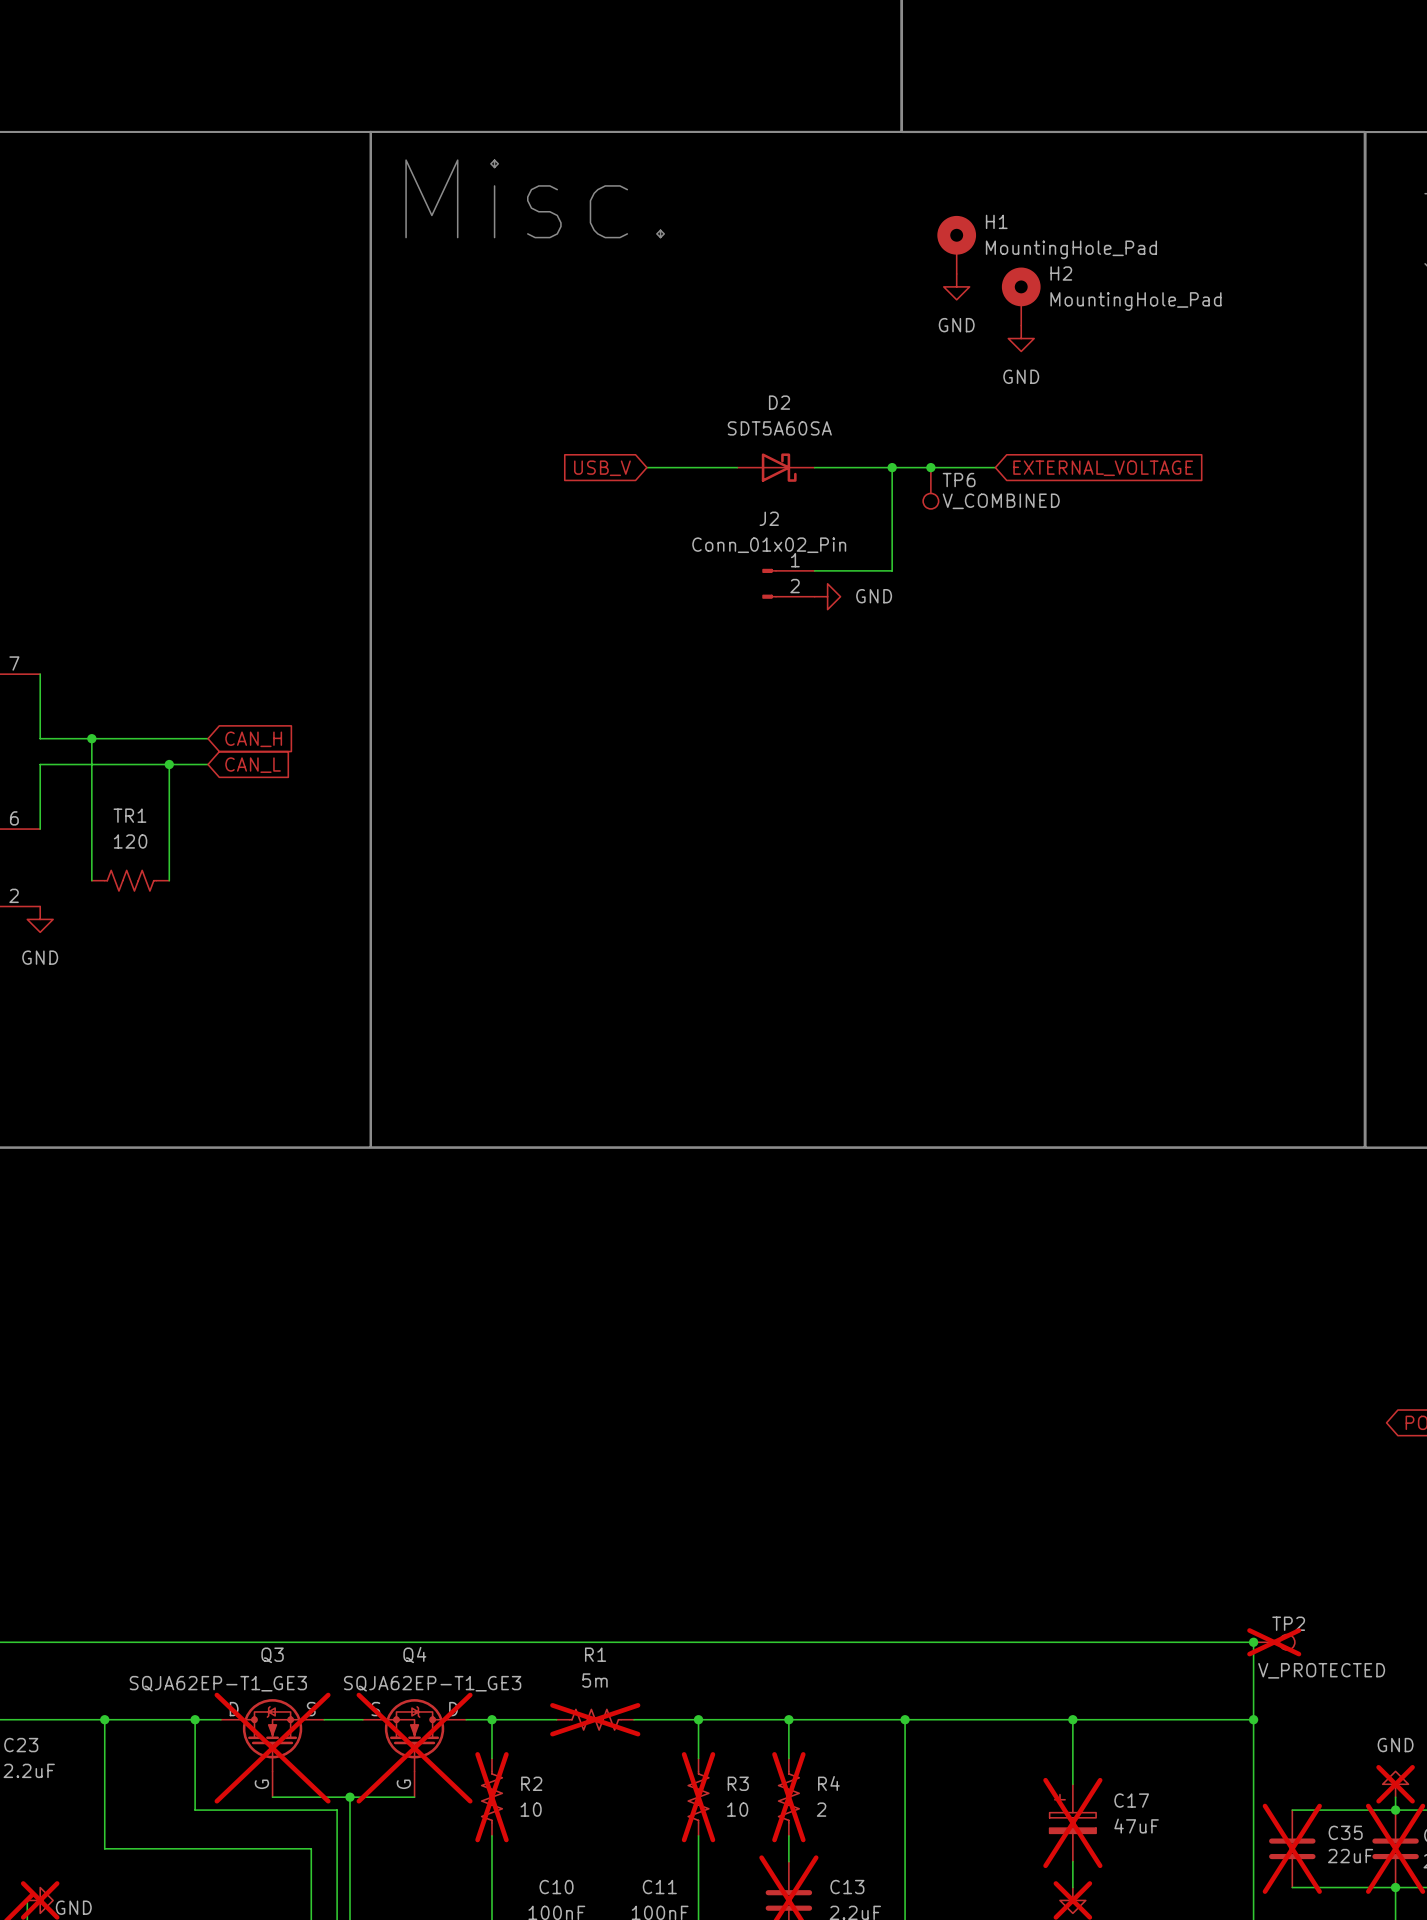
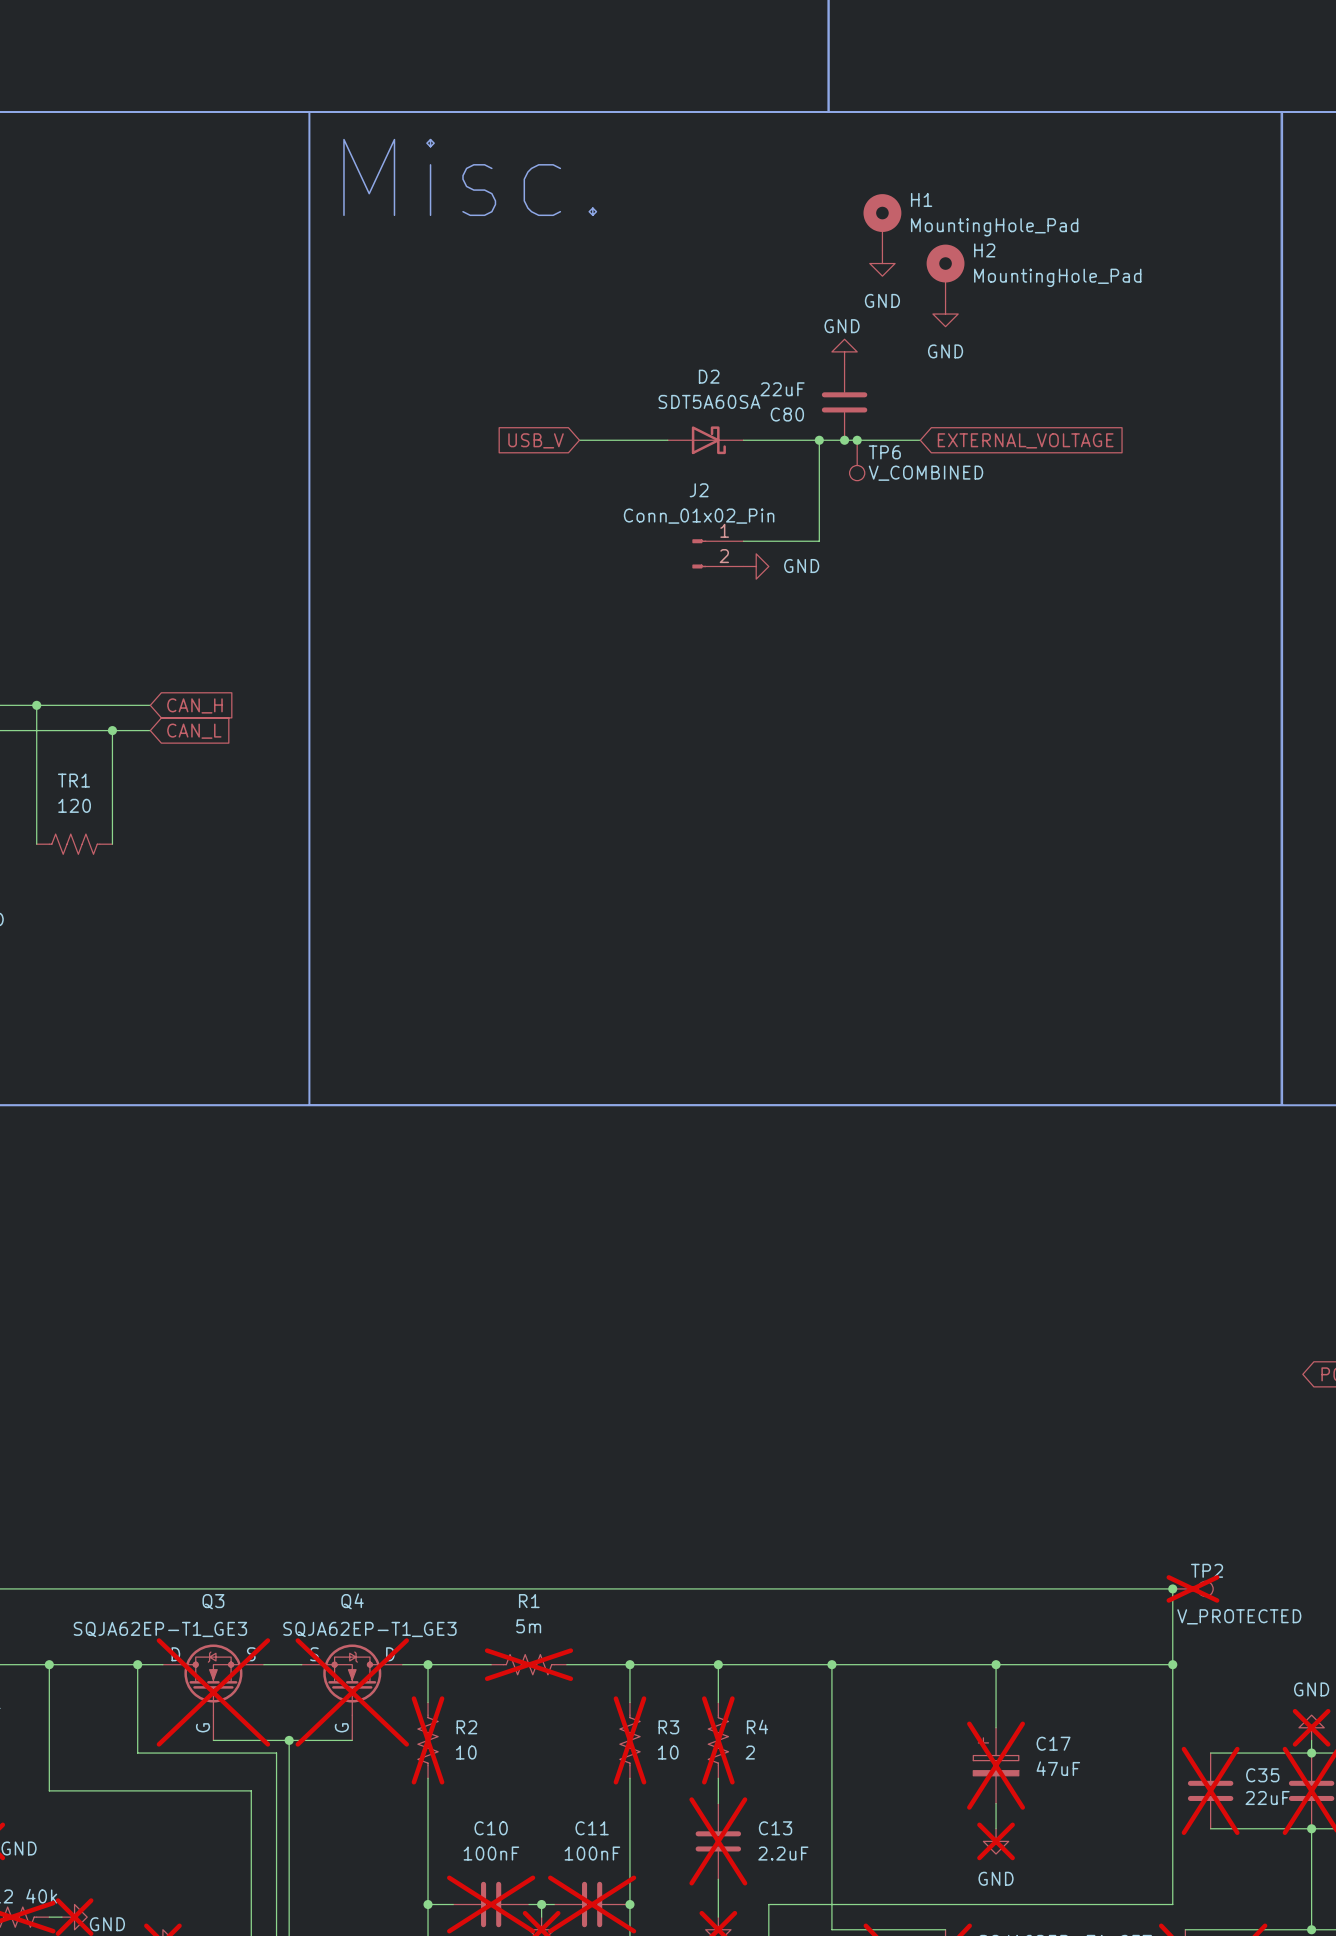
power symbol: none -> GND (844, 351)
C80: none -> 22uF (844, 402)
junction: none -> (844, 440)

